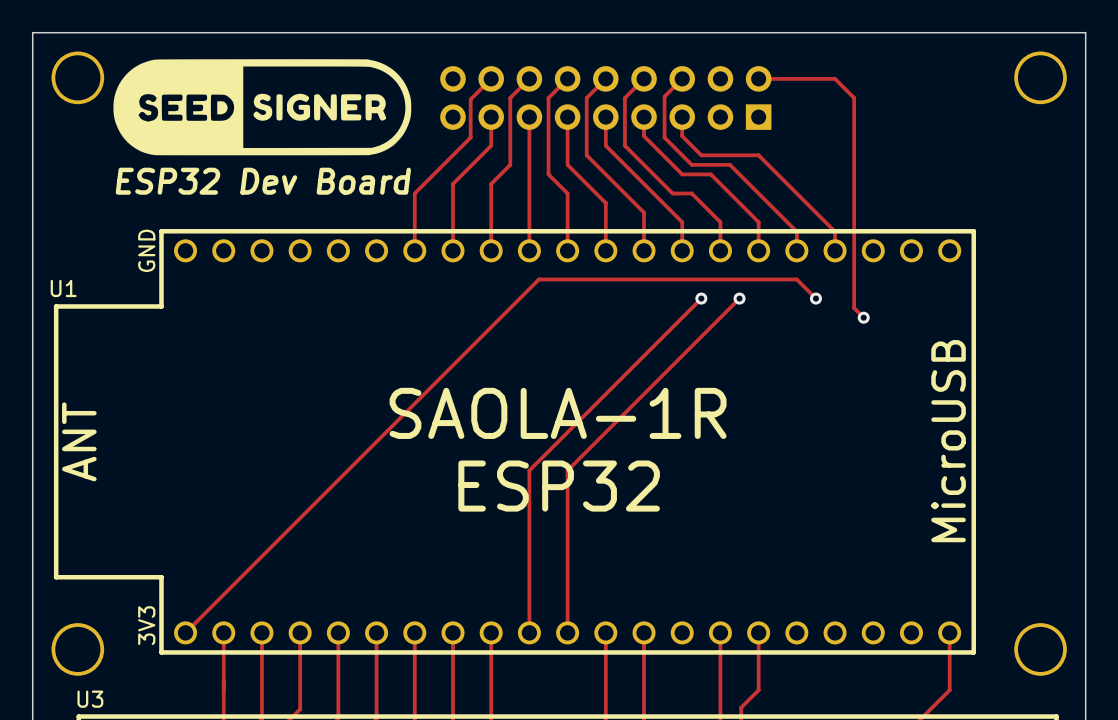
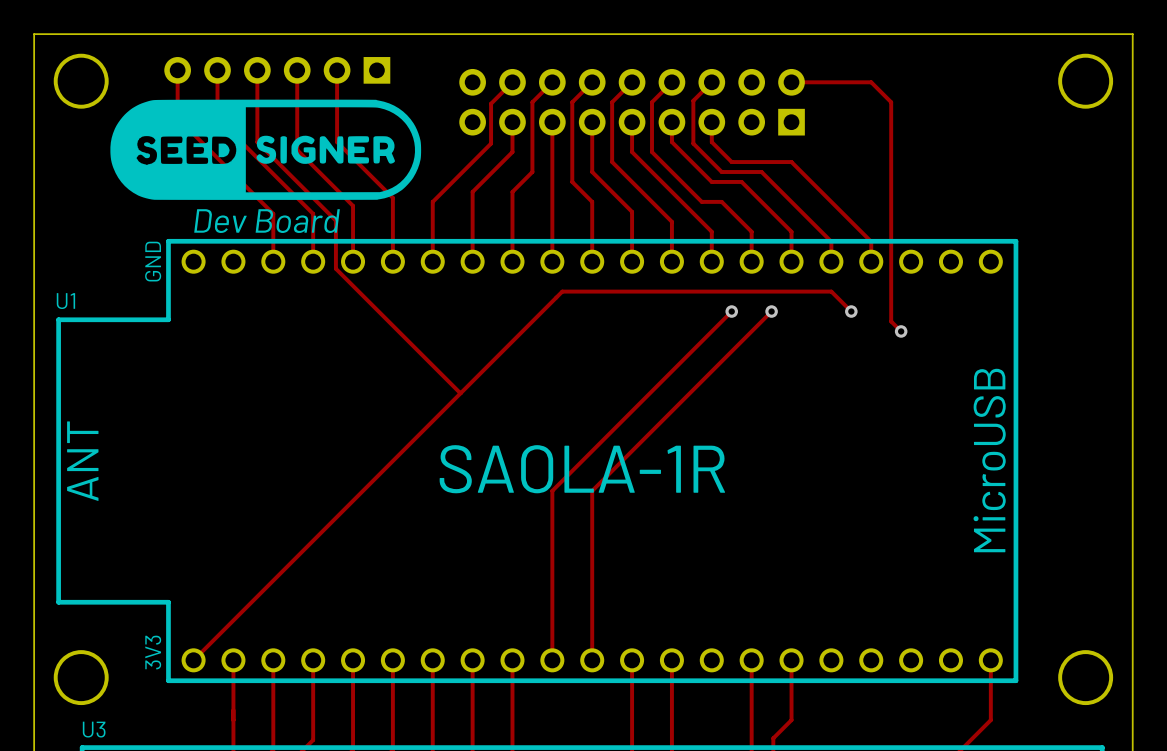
track: none -> (177, 70) (177, 118) (273, 213) (273, 261)
track: none -> (217, 70) (217, 118) (313, 213) (313, 261)
track: none -> (257, 70) (257, 142) (335, 220) (335, 268) (460, 393)
part: none -> (277, 70)
track: none -> (297, 70) (297, 150) (353, 205) (353, 261)
track: none -> (337, 70) (337, 142) (392, 197) (392, 261)
drawing position: (262, 107) -> (265, 149)
text: ESP32 Dev Board (263, 181) -> Dev Board (267, 221)
text position: SAOLA-1R (558, 413) -> SAOLA-1R (582, 469)
text: ESP32 (559, 486) -> none

